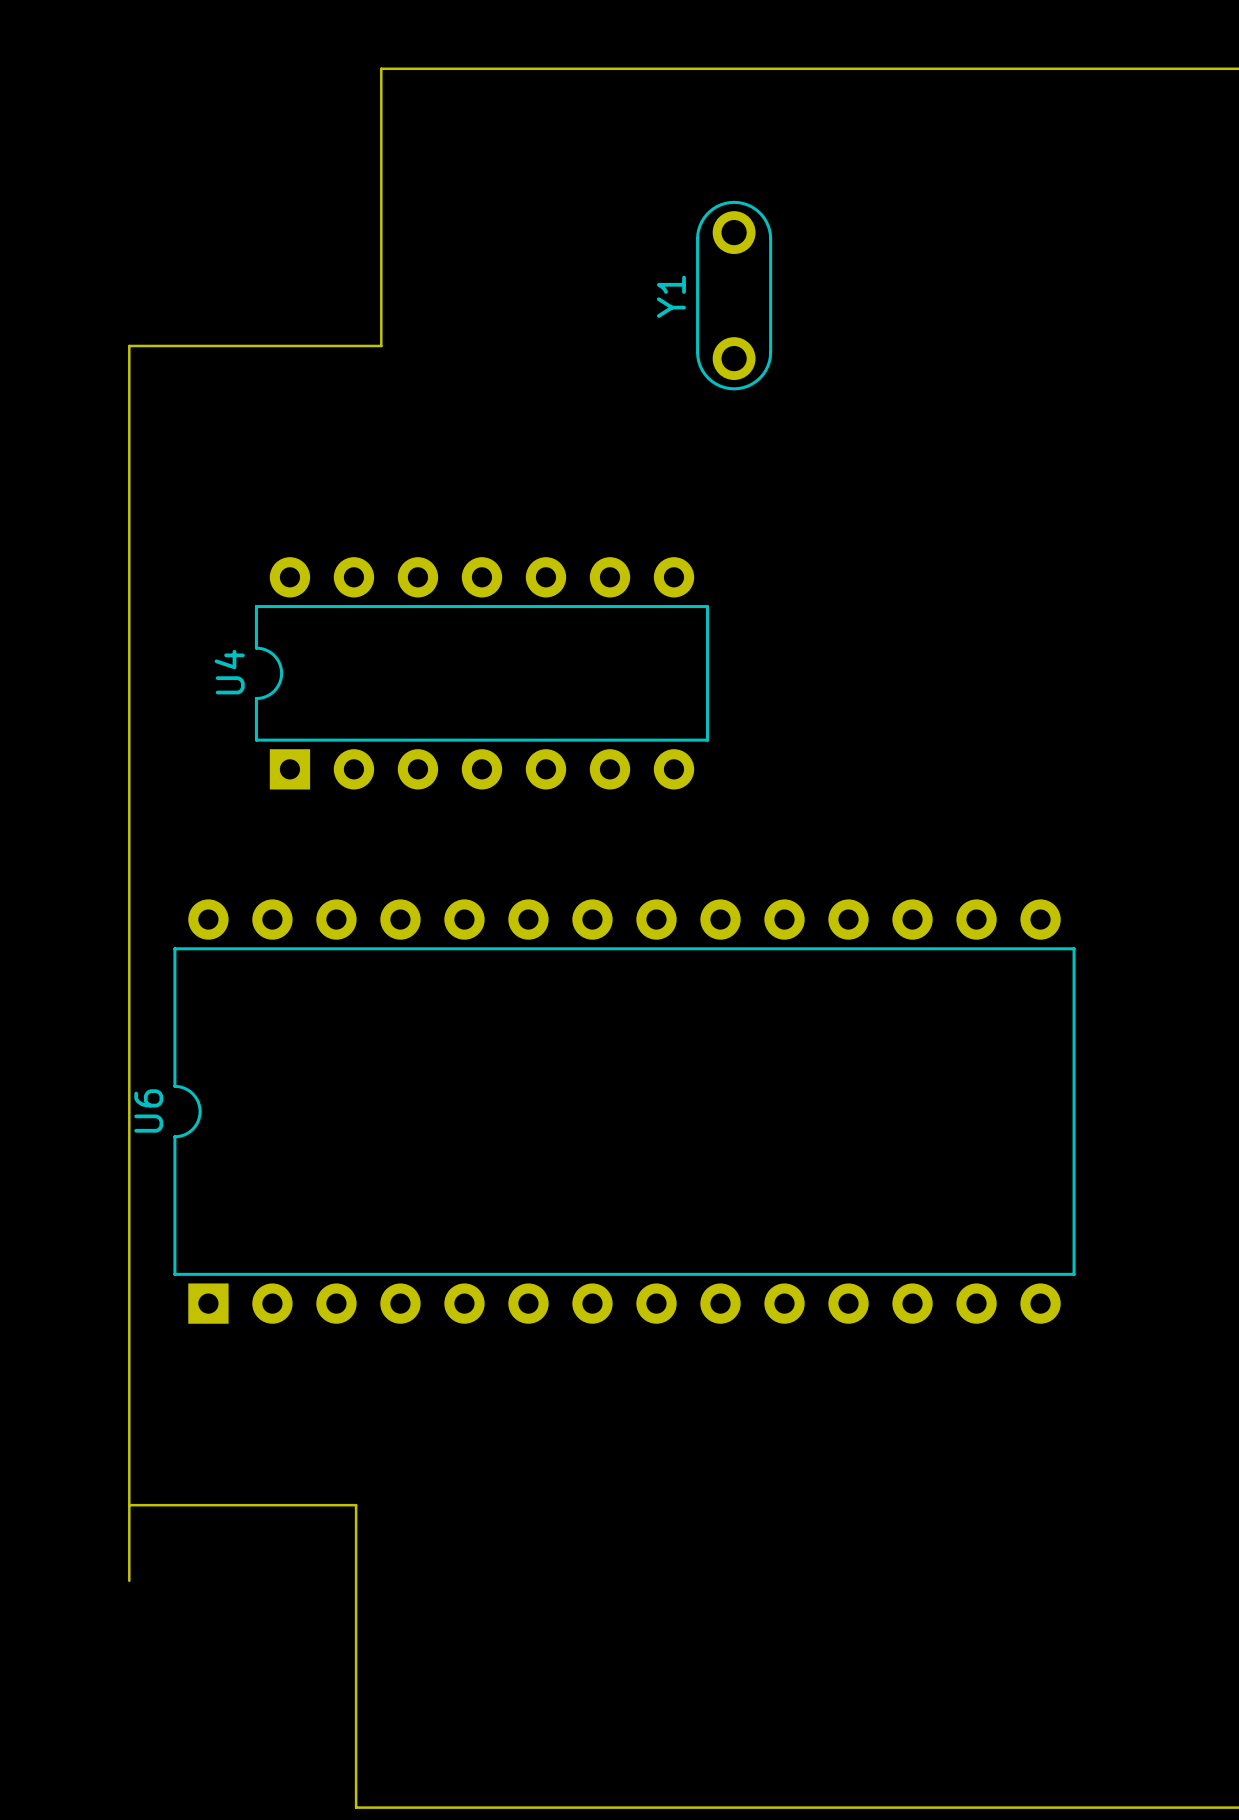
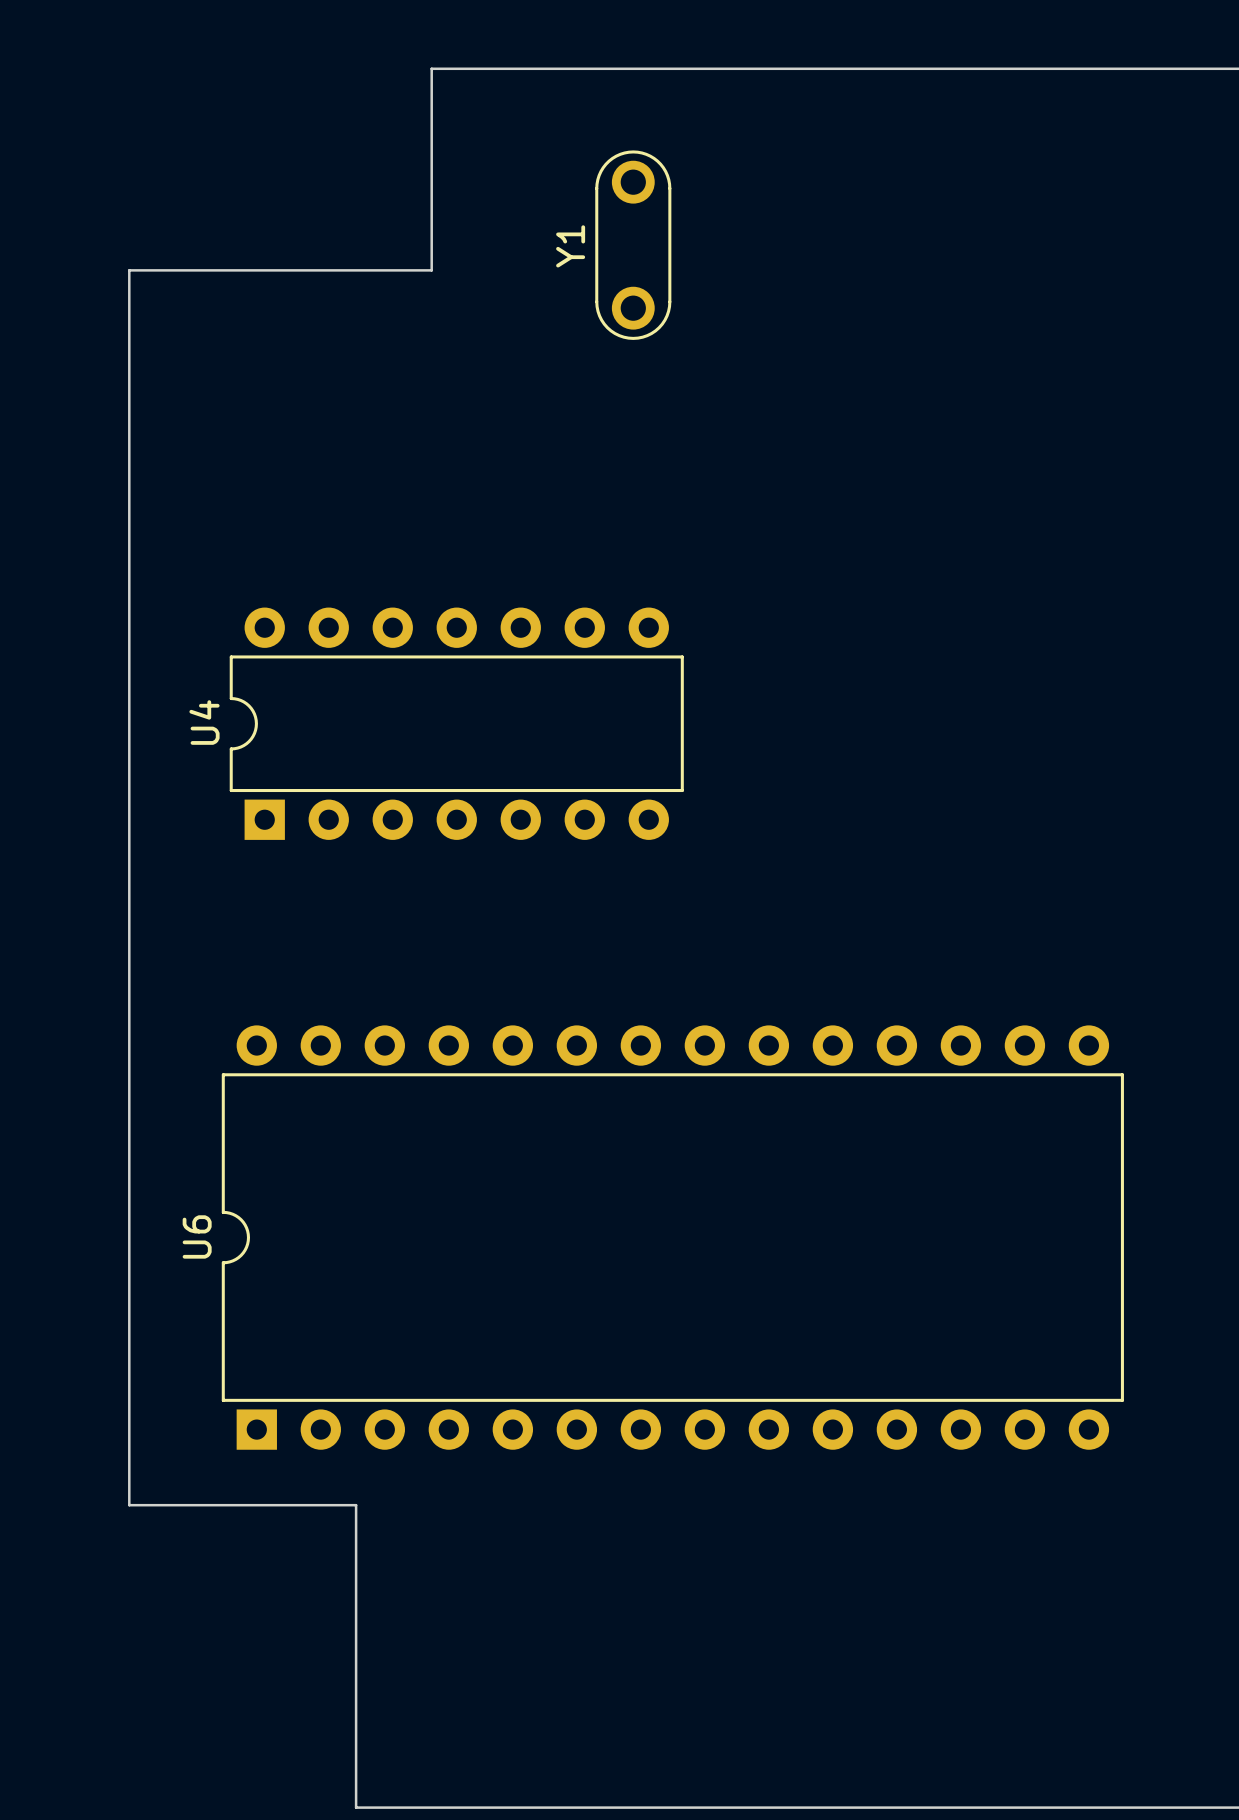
board edge: (431, 68) (381, 68) (381, 345) (129, 345) -> (431, 68) (431, 270) (129, 270) (129, 345)
Y1 position: (734, 295) -> (633, 245)
U4 position: (481, 673) -> (456, 723)
U6 position: (624, 1111) -> (672, 1237)
board edge: (129, 1505) (129, 1580) -> none

